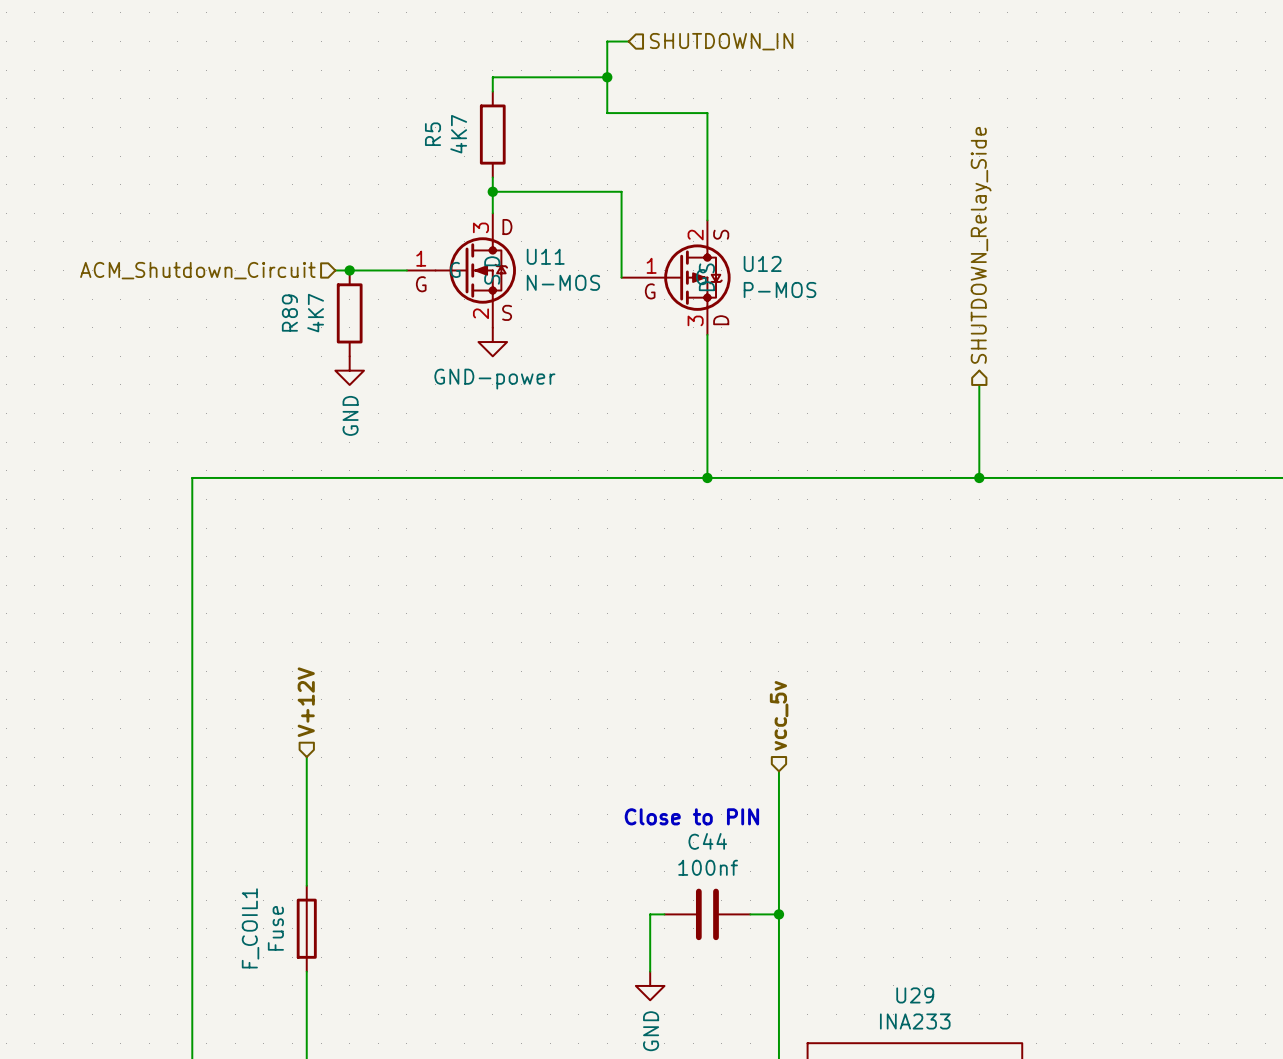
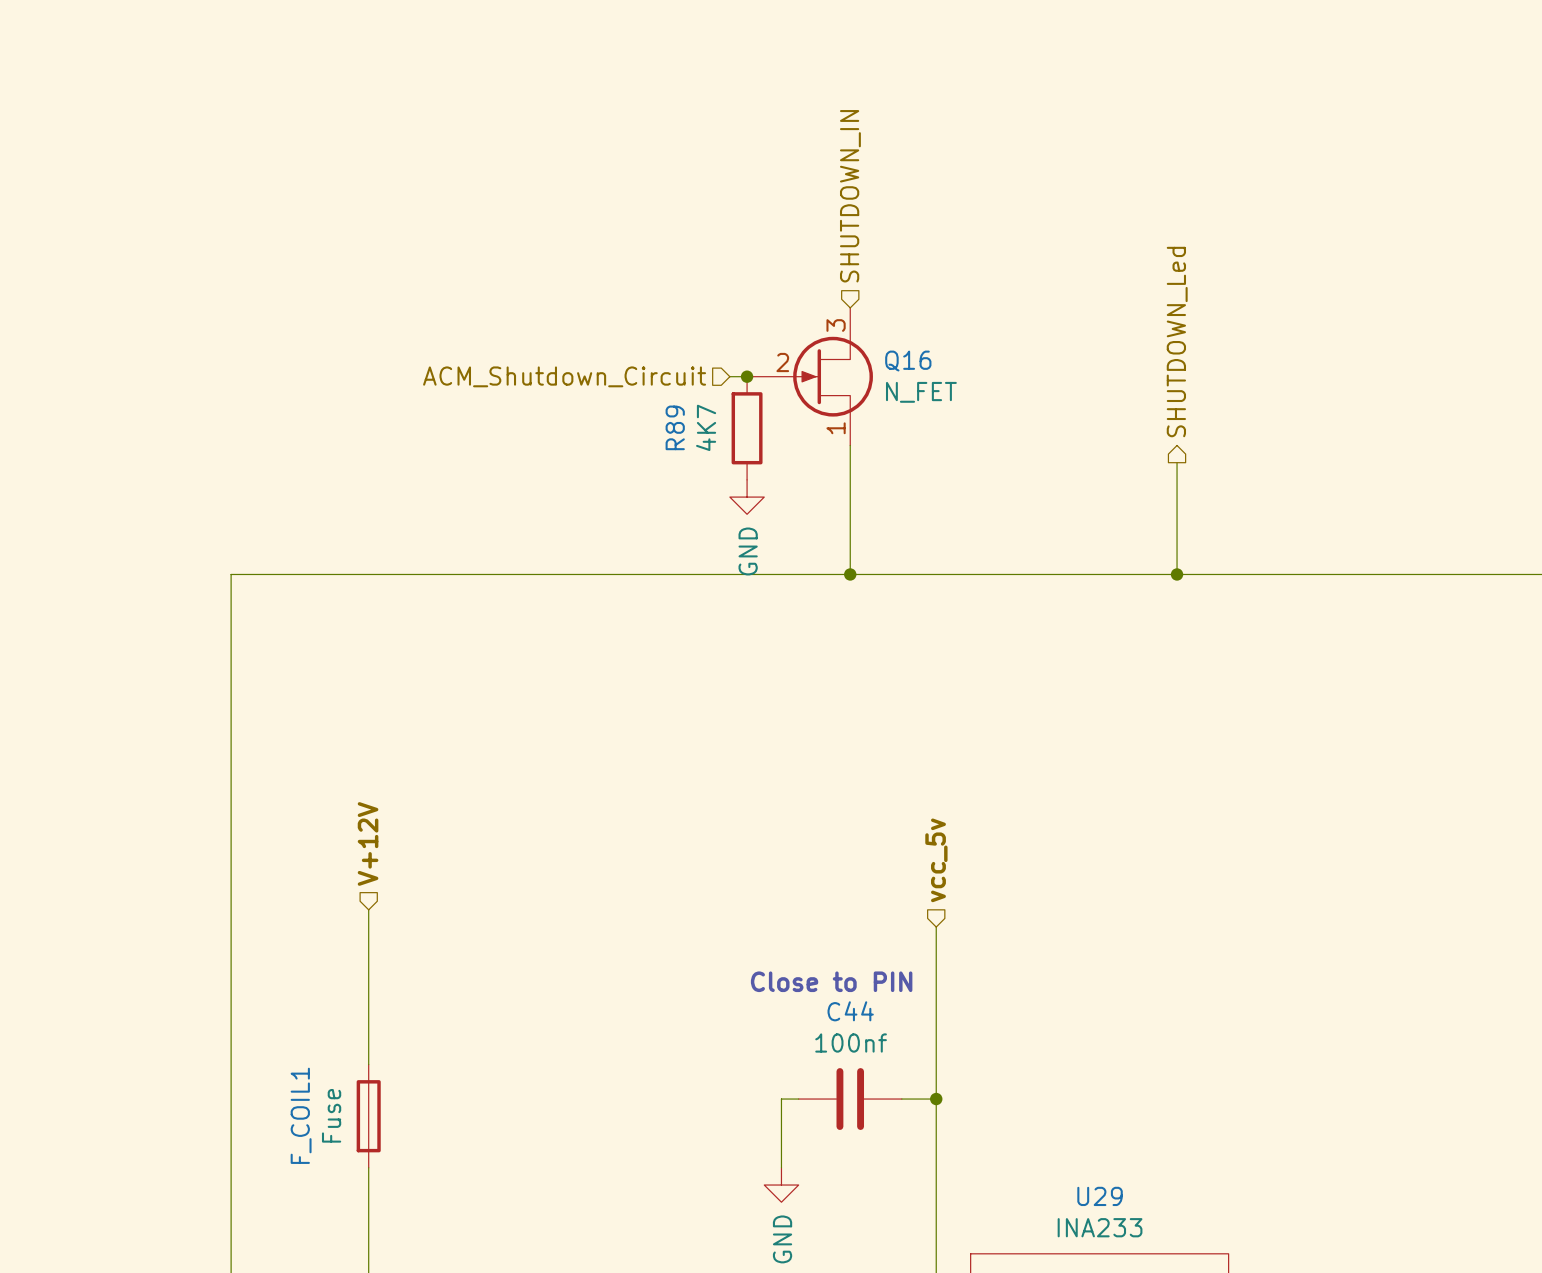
wire: (628, 41) (607, 41) (607, 113) (707, 113) (707, 220) -> none
hierarchical label rotation: 0° (721, 41) -> 90° counterclockwise (850, 196)
wire: (607, 77) (492, 77) (492, 91) -> none
junction: (607, 77) -> none
R5: 4K7 (492, 134) -> none
wire: (492, 177) (492, 213) -> none
wire: (492, 191) (621, 191) (621, 277) -> none
junction: (492, 191) -> none
hierarchical label: SHUTDOWN_Relay_Side (981, 245) -> SHUTDOWN_Led (1177, 342)
hierarchical label position: ACM_Shutdown_Circuit (197, 270) -> ACM_Shutdown_Circuit (564, 376)
wire: (335, 270) (406, 270) -> none
junction: (349, 270) -> none
U11: N-MOS (461, 270) -> none
U12: P-MOS (676, 277) -> none
R89 position: (349, 313) -> (747, 428)
wire: none -> (729, 376) (747, 376)
junction: none -> (747, 376)
Q16: none -> N_FET (810, 376)
power symbol: GND-power (492, 342) -> none
power symbol position: GND (349, 370) -> GND (747, 497)

